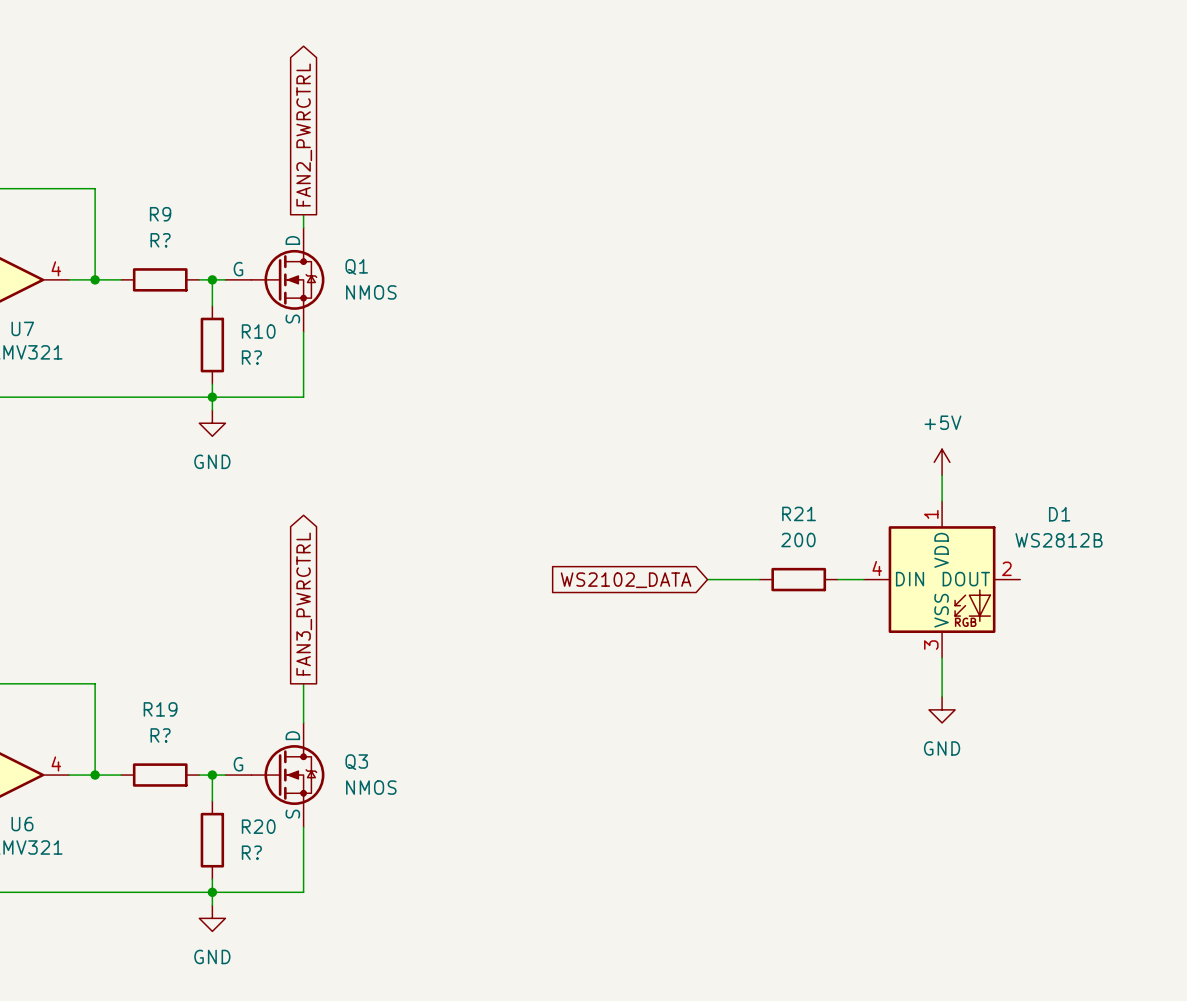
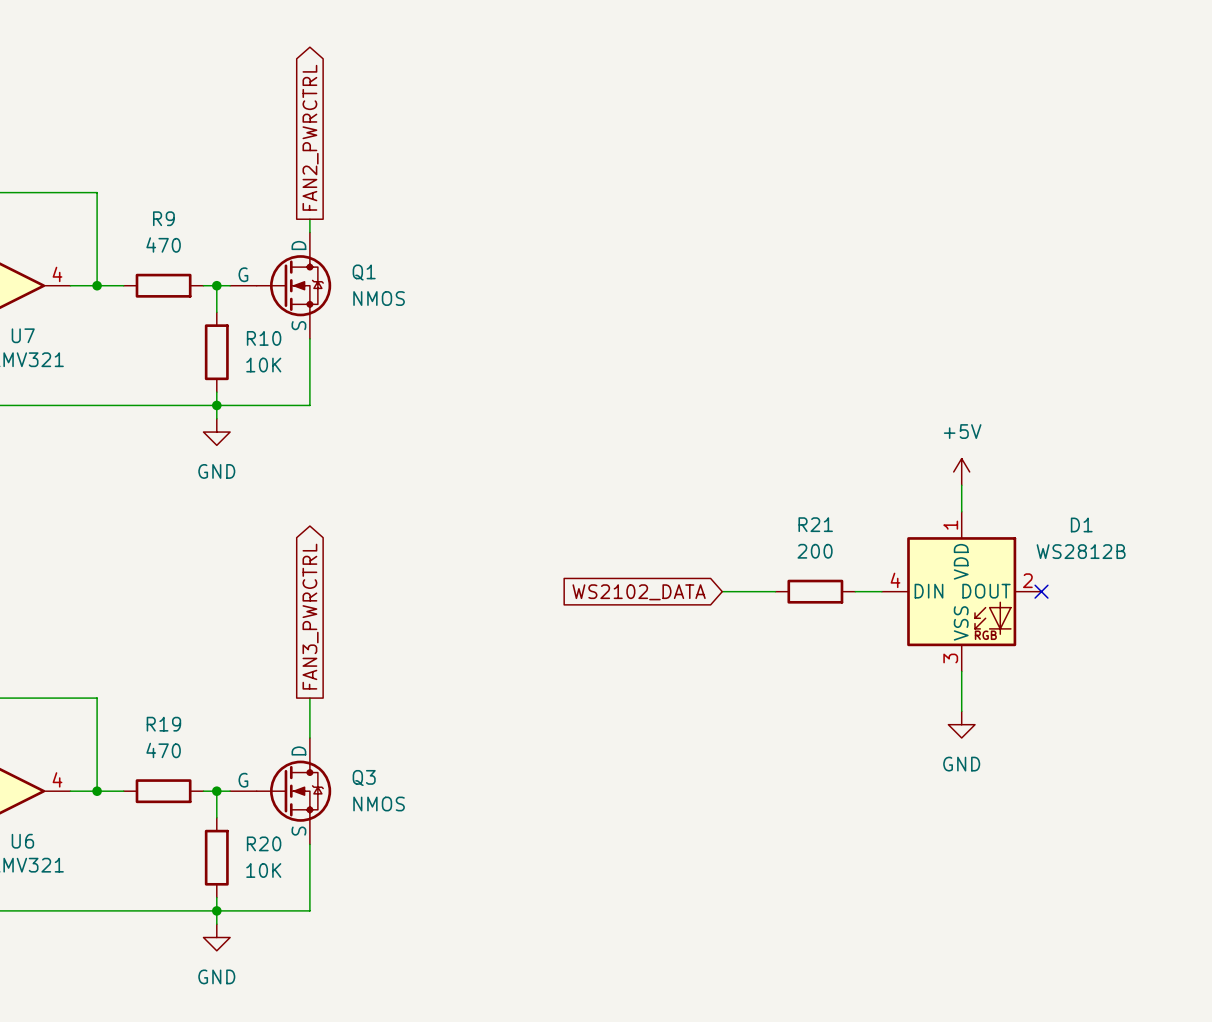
R9 value: R? (160, 240) -> 470 (163, 245)
R10 value: R? (251, 357) -> 10K (263, 365)
no-connect mark: none -> (1041, 591)
R19 value: R? (160, 735) -> 470 (163, 750)
R20 value: R? (251, 852) -> 10K (263, 870)

